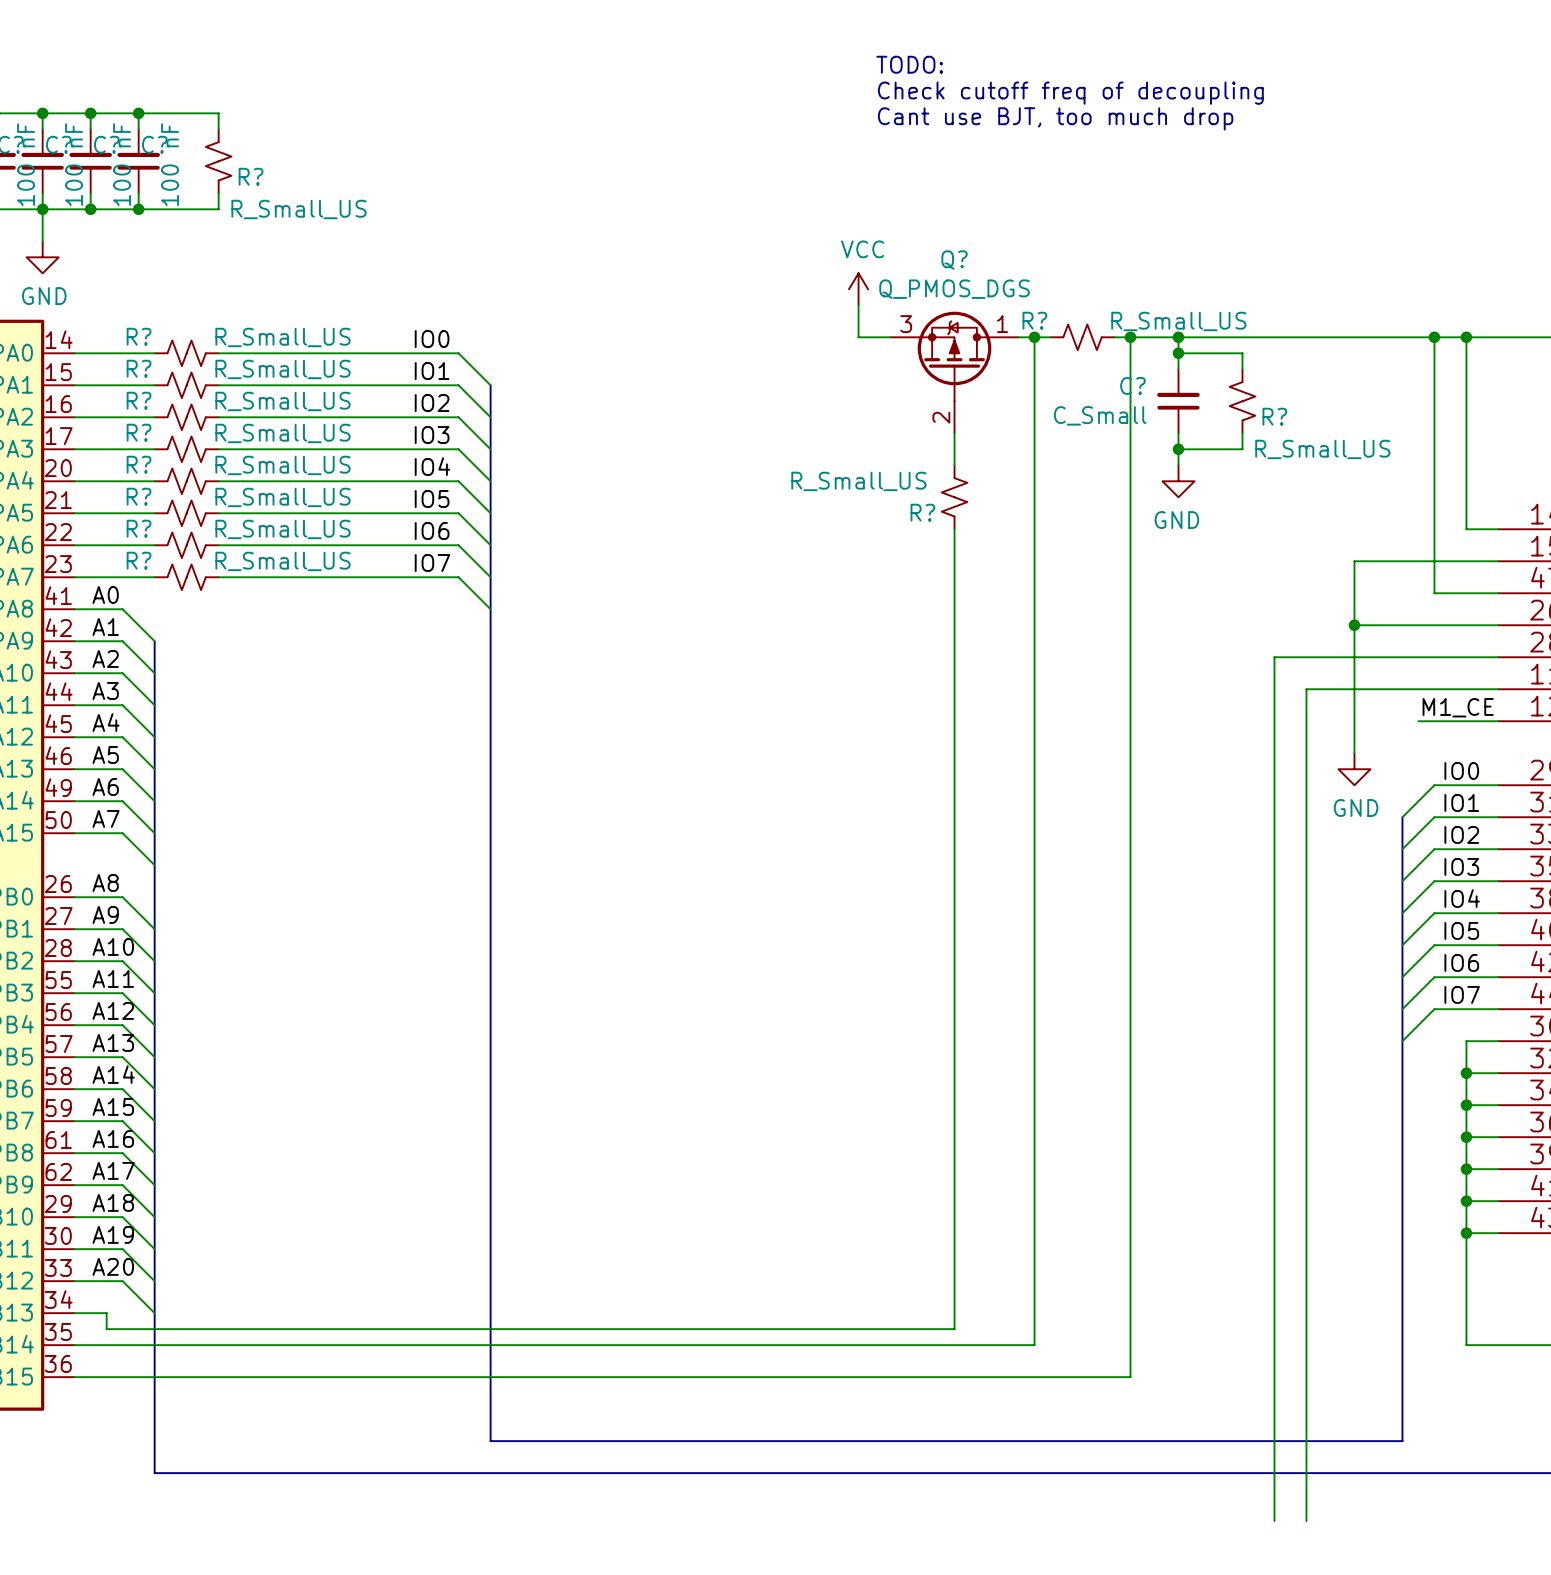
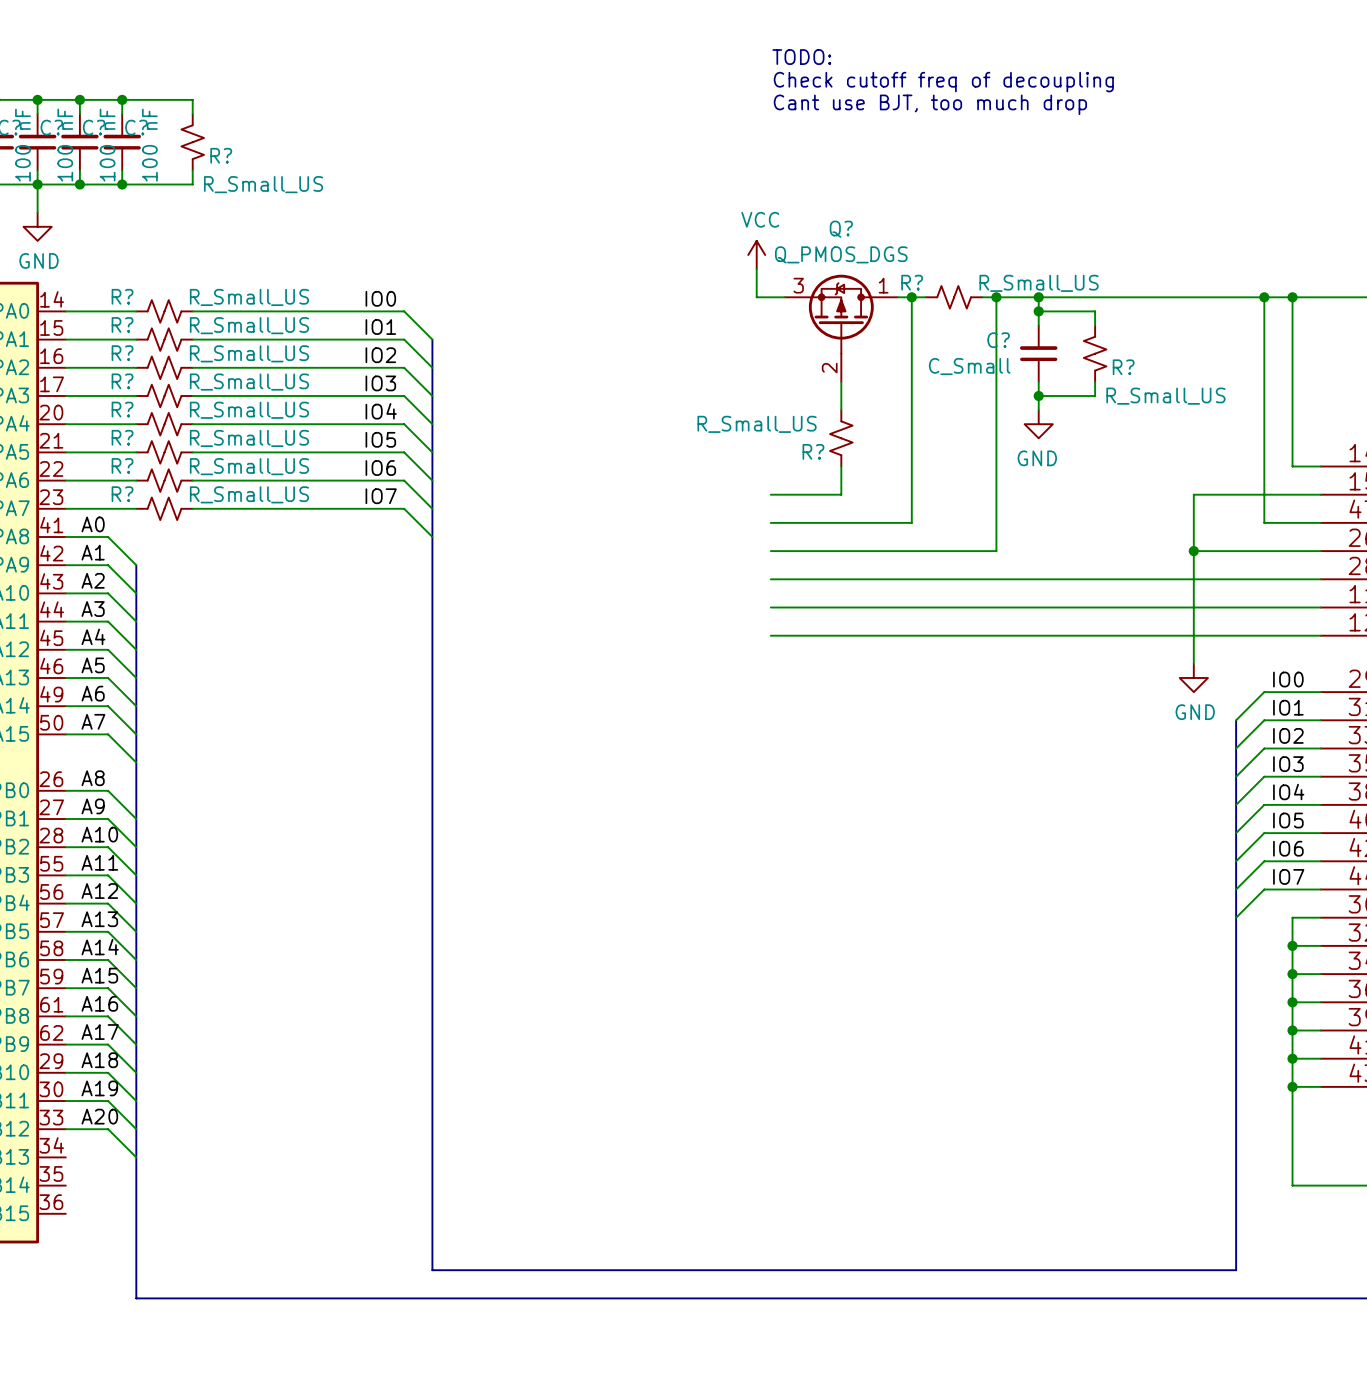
wire: (954, 561) (954, 1329) (106, 1329) (106, 1313) (74, 1313) -> (841, 494) (770, 494)
wire: (1034, 593) (1034, 1345) (74, 1345) -> (911, 522) (770, 522)
wire: (1130, 625) (1130, 1377) (74, 1377) -> (996, 551) (770, 551)
wire: (1274, 657) (1274, 1521) -> (1123, 579) (770, 579)
wire: (1306, 689) (1306, 1521) -> (1151, 607) (770, 607)
label: M1_CE (1458, 707) -> none
wire: none -> (770, 635) (1250, 635)

